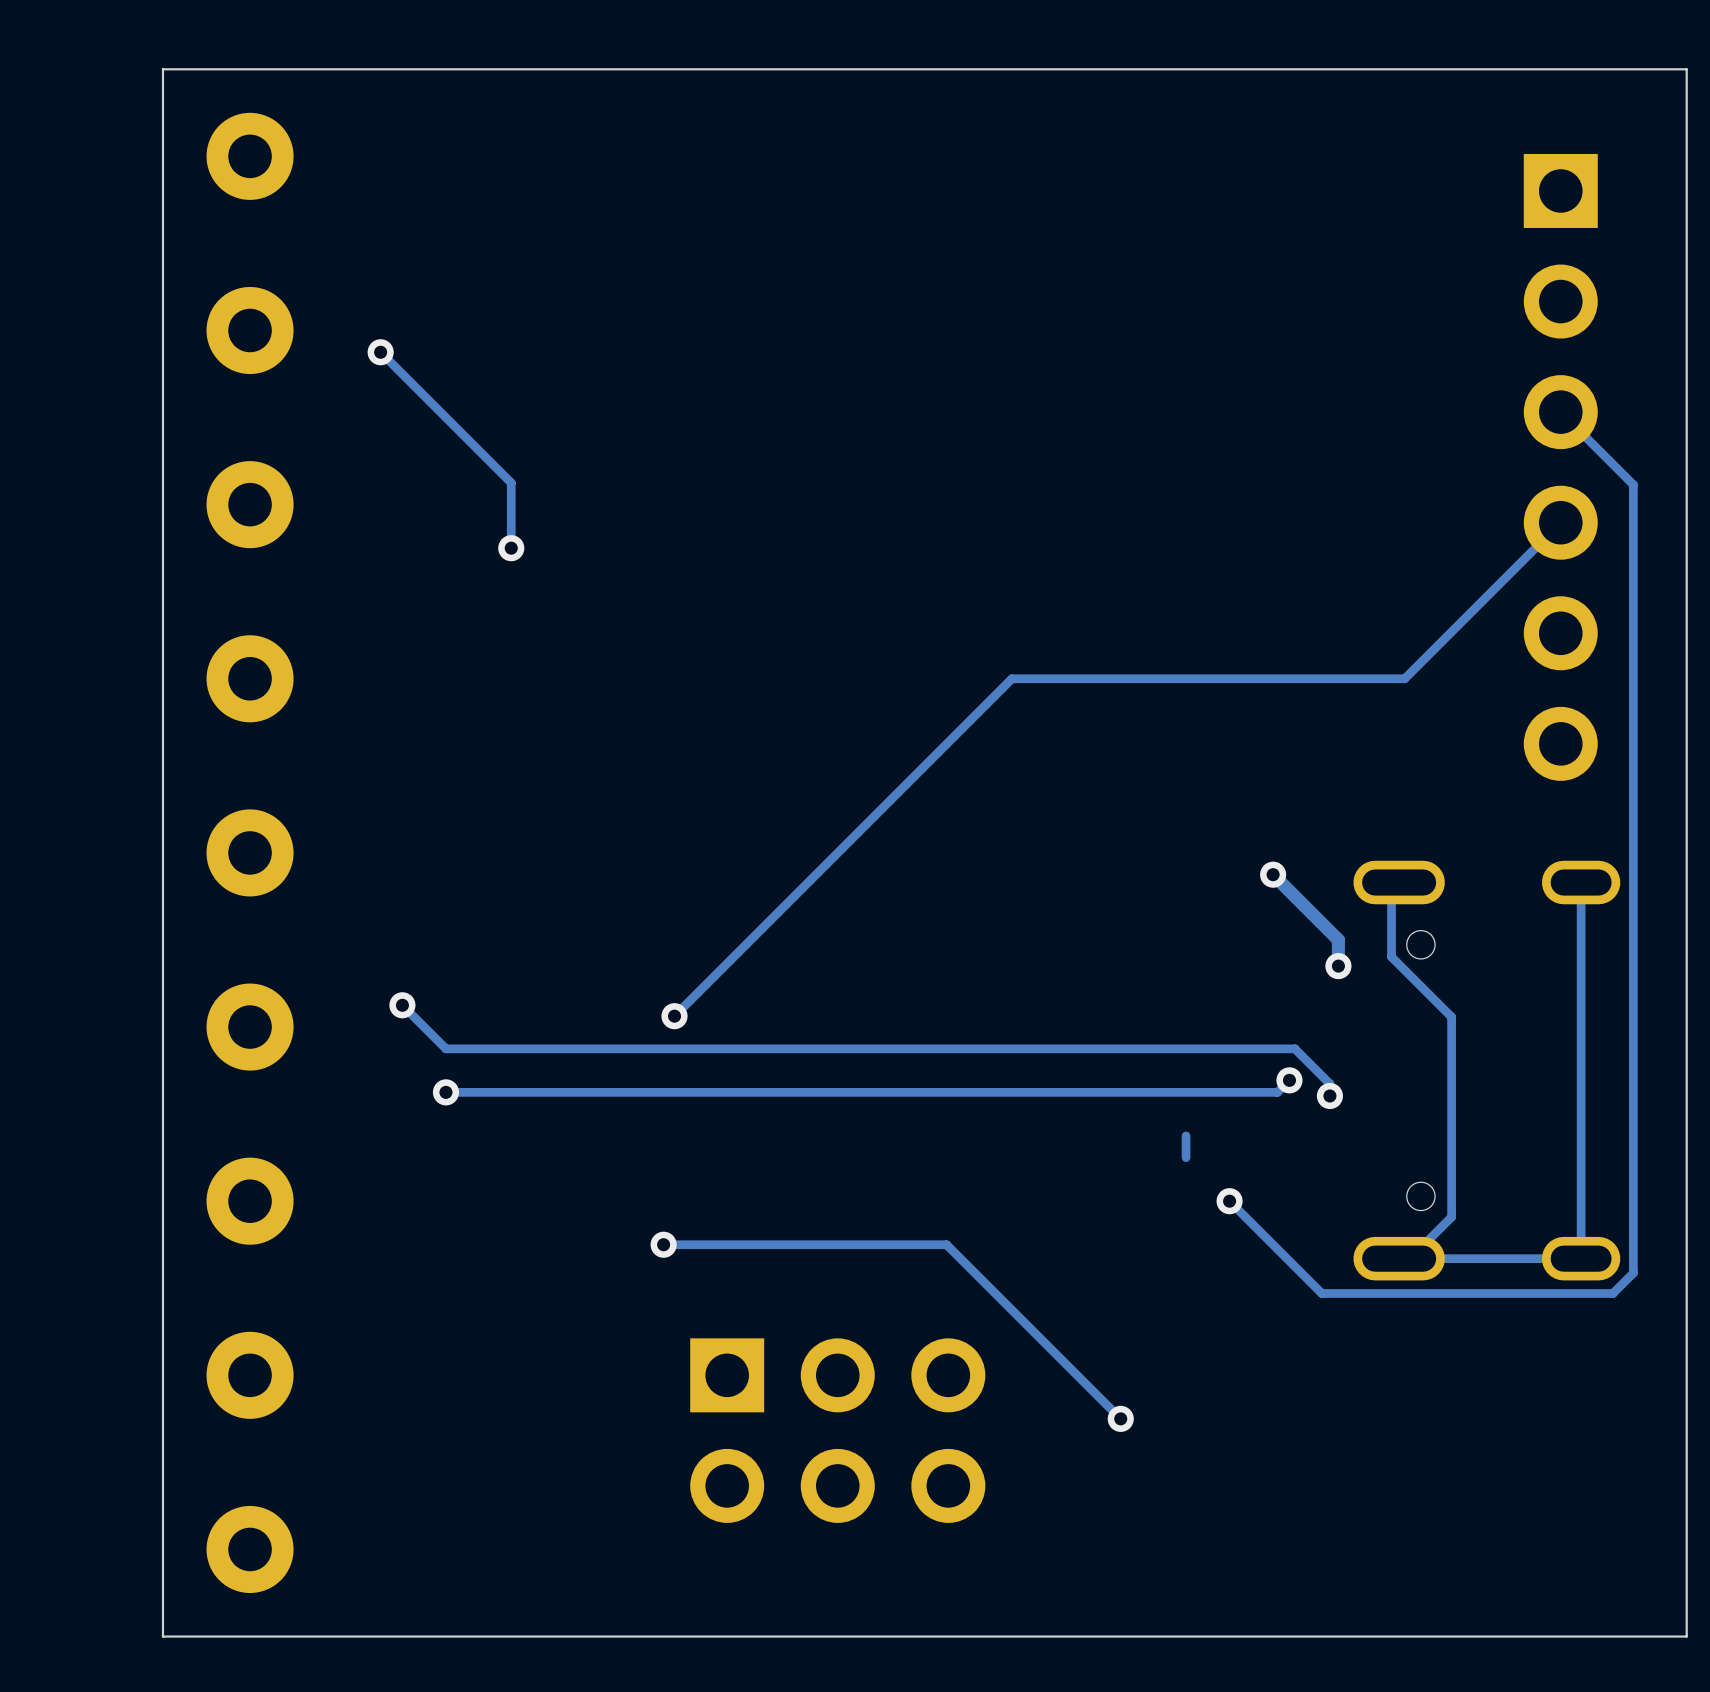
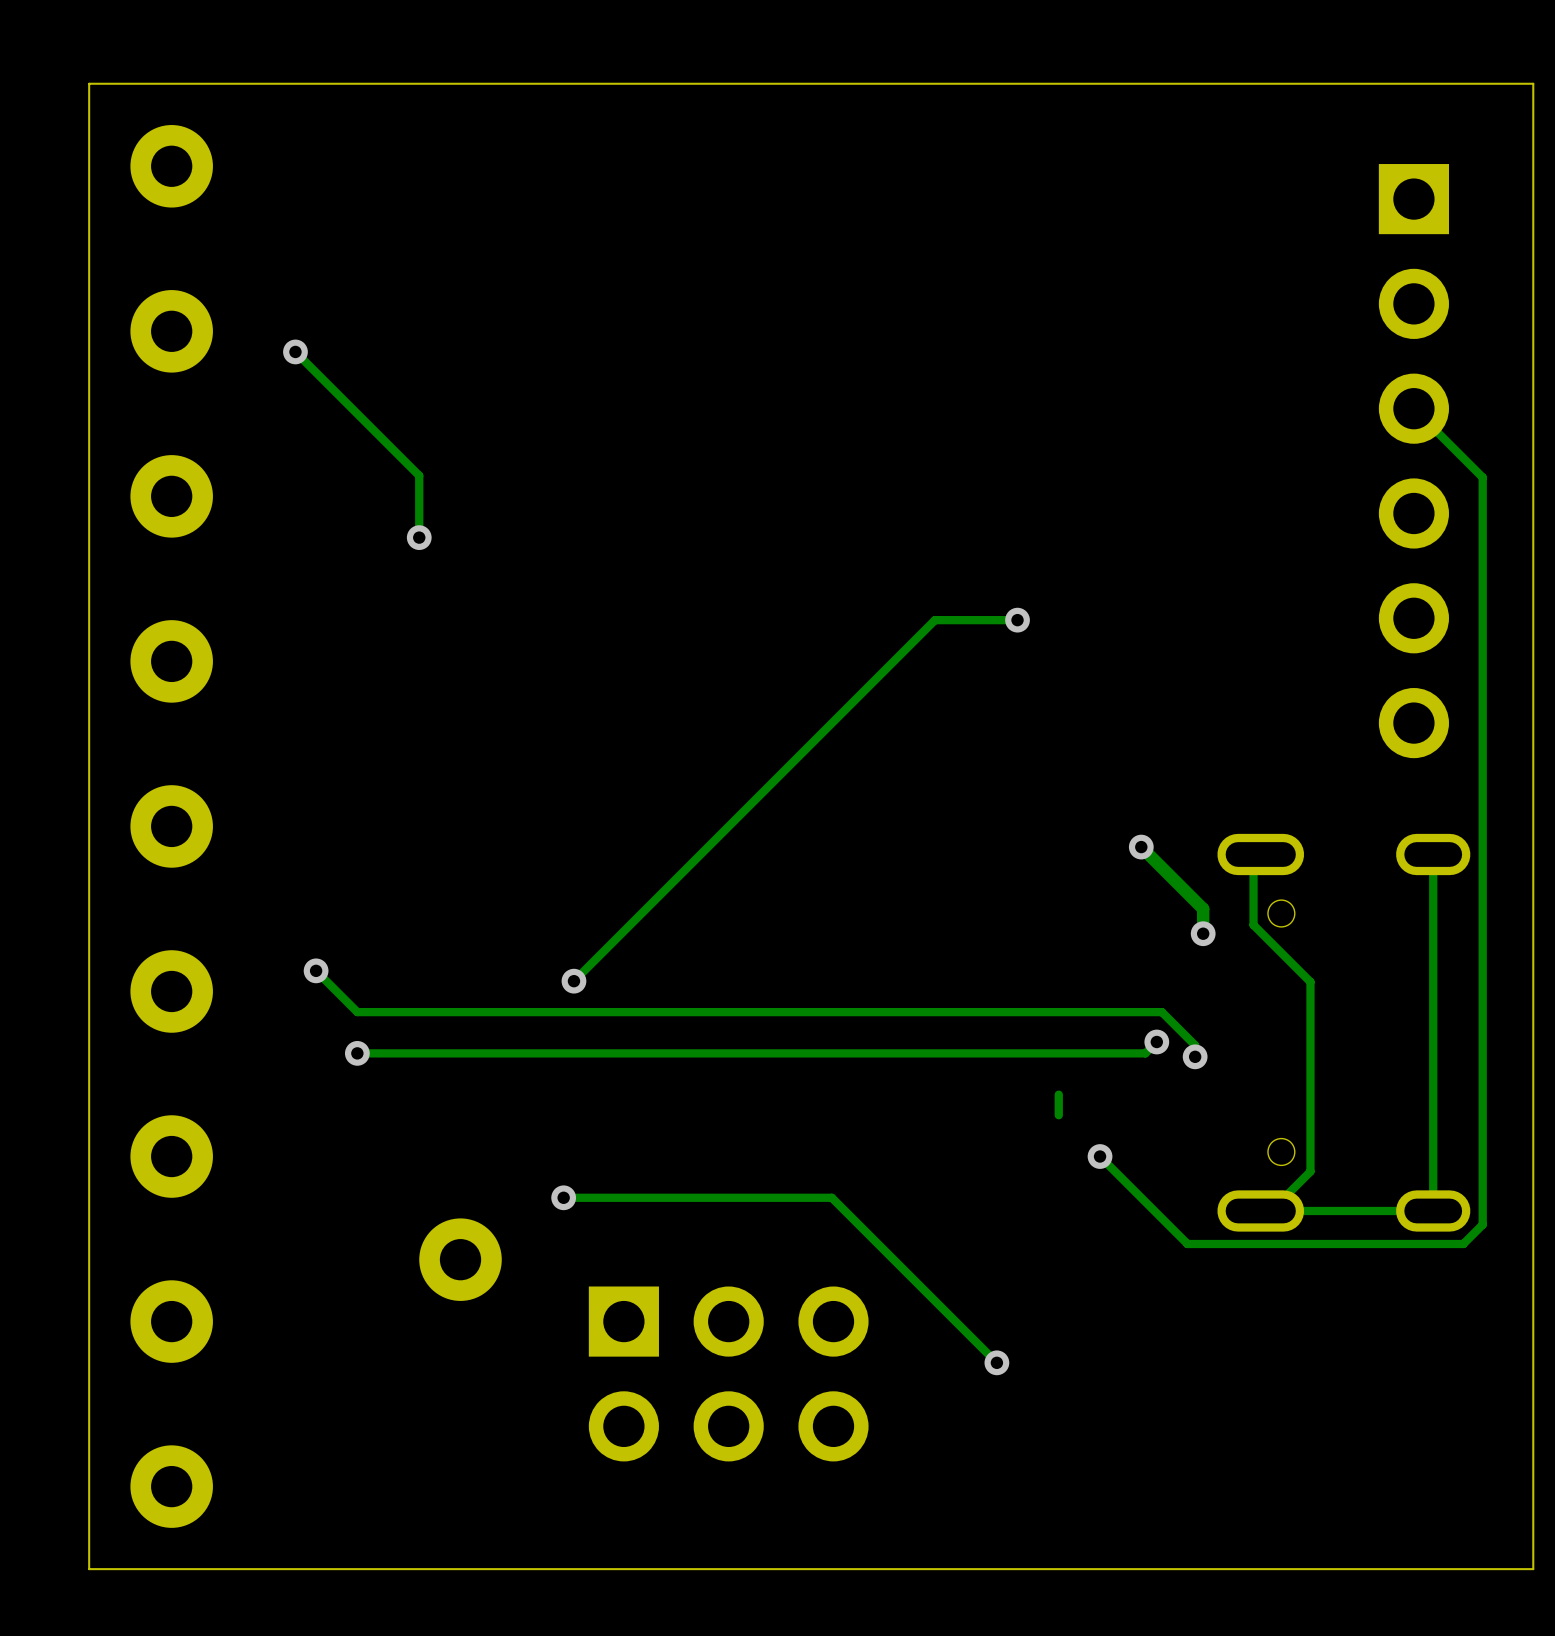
track: (1560, 522) (1404, 678) (1011, 678) -> (1017, 620) (935, 620) (893, 661)
via: none -> (1017, 620)
part: none -> (460, 1259)

